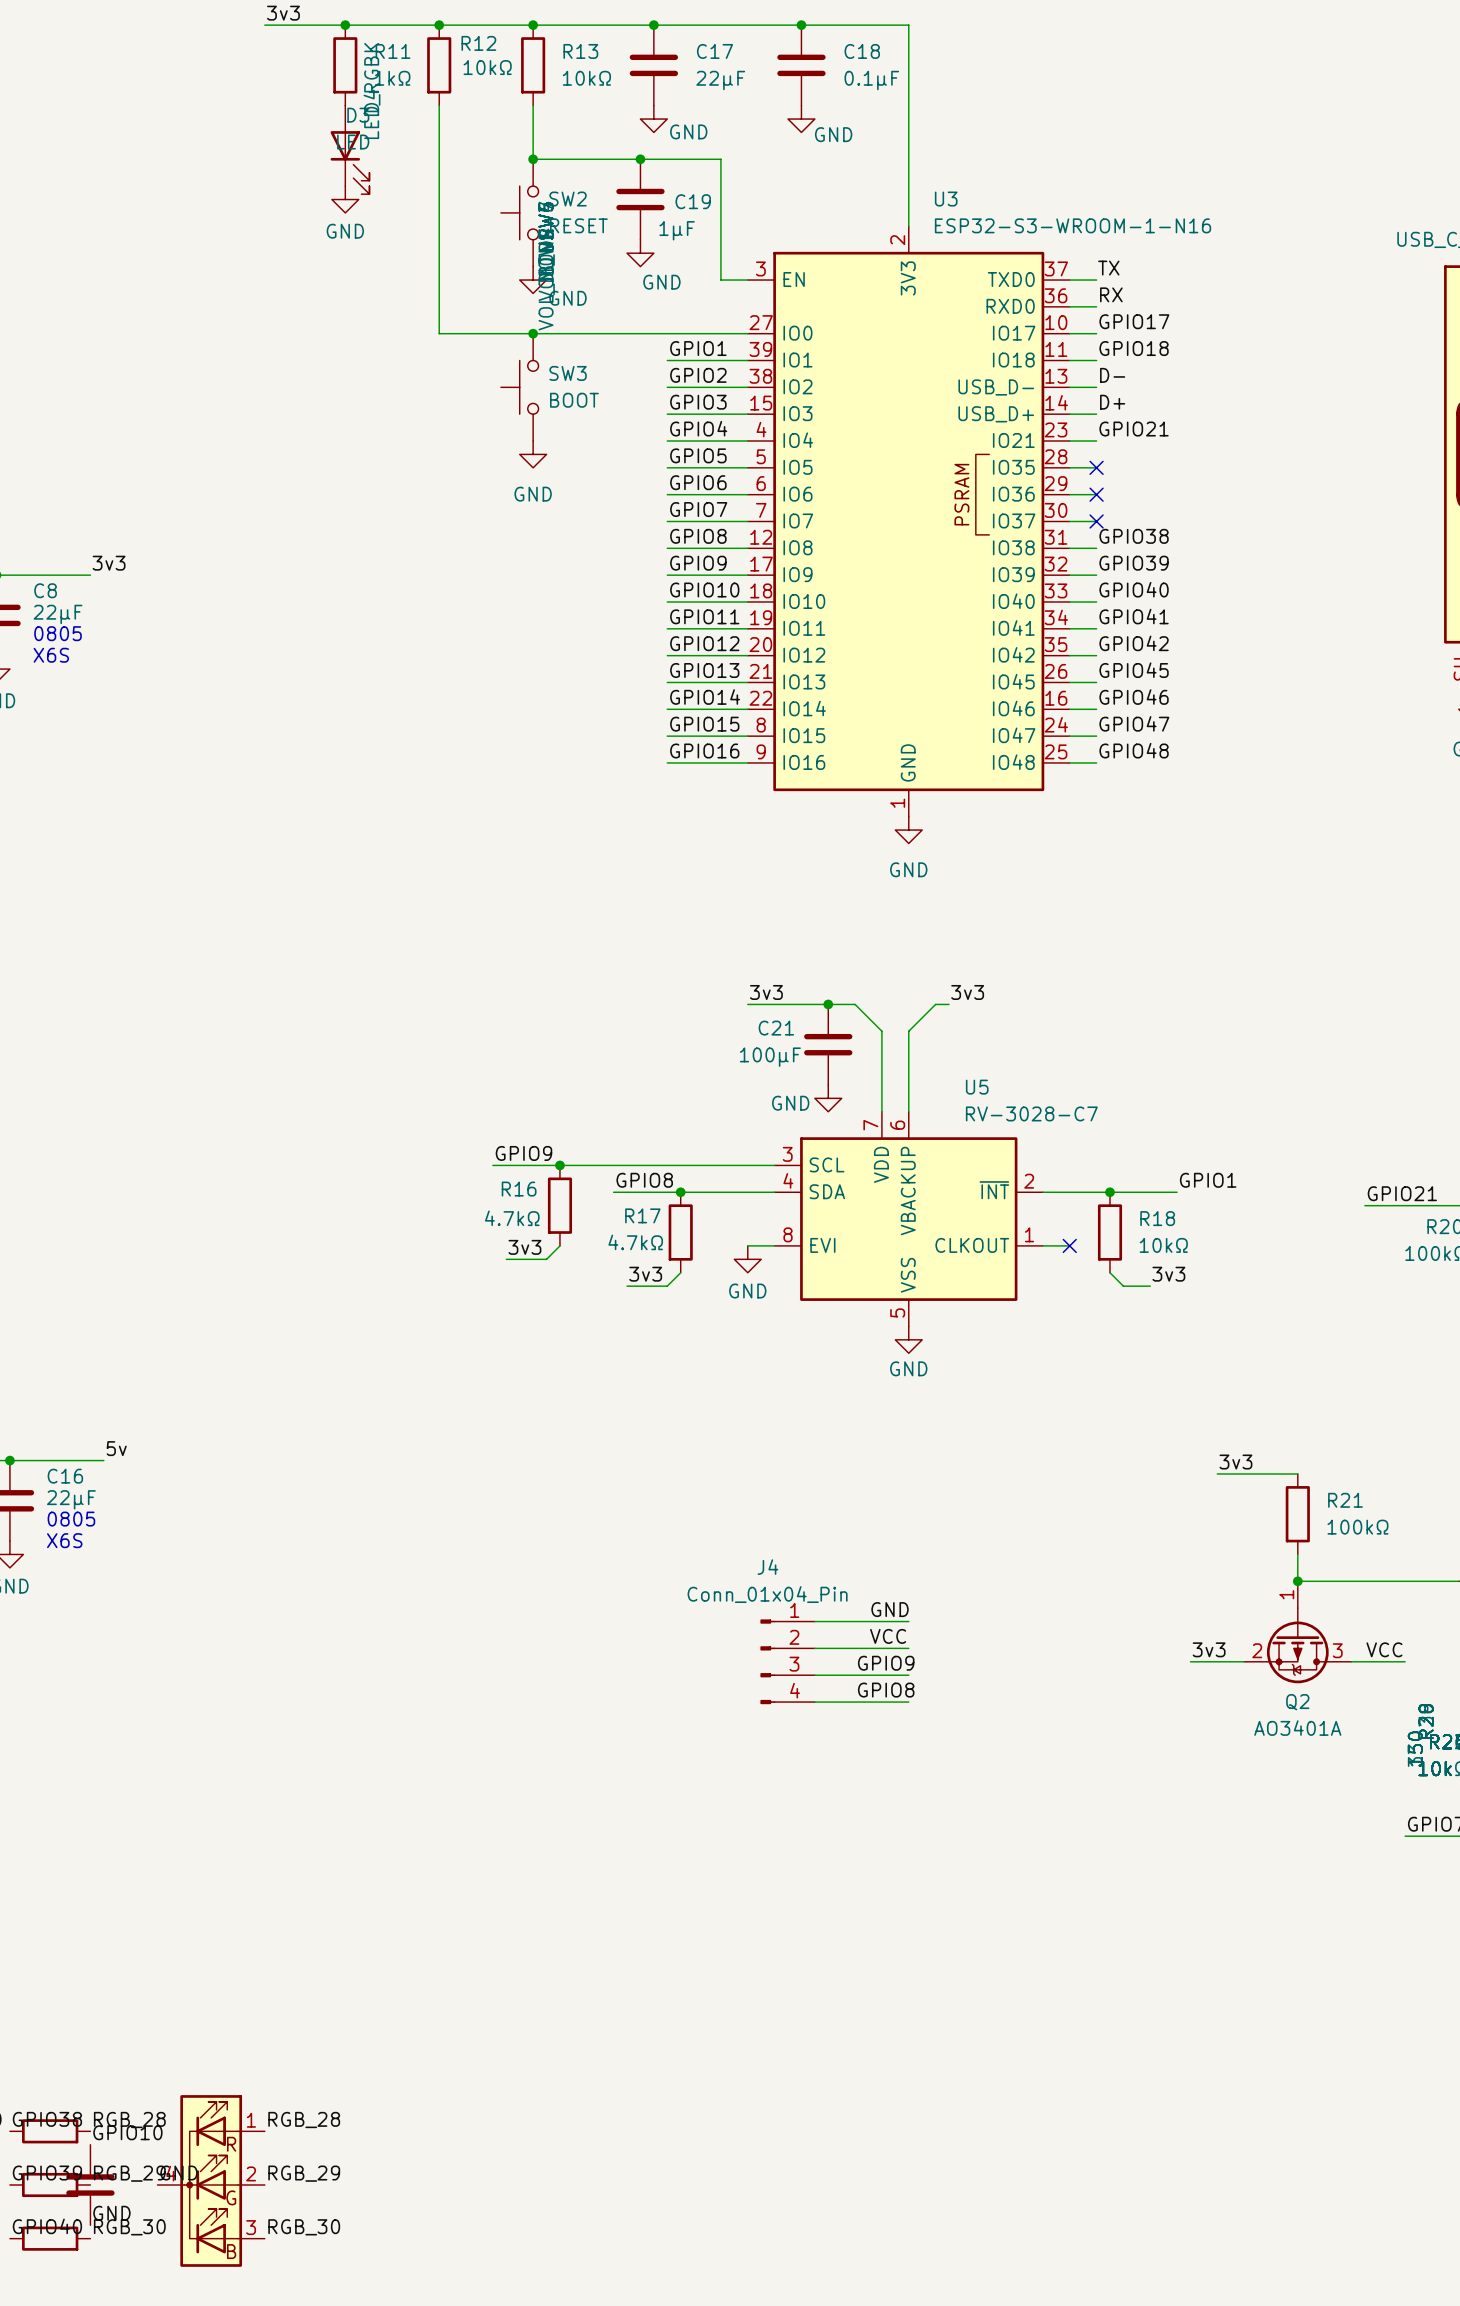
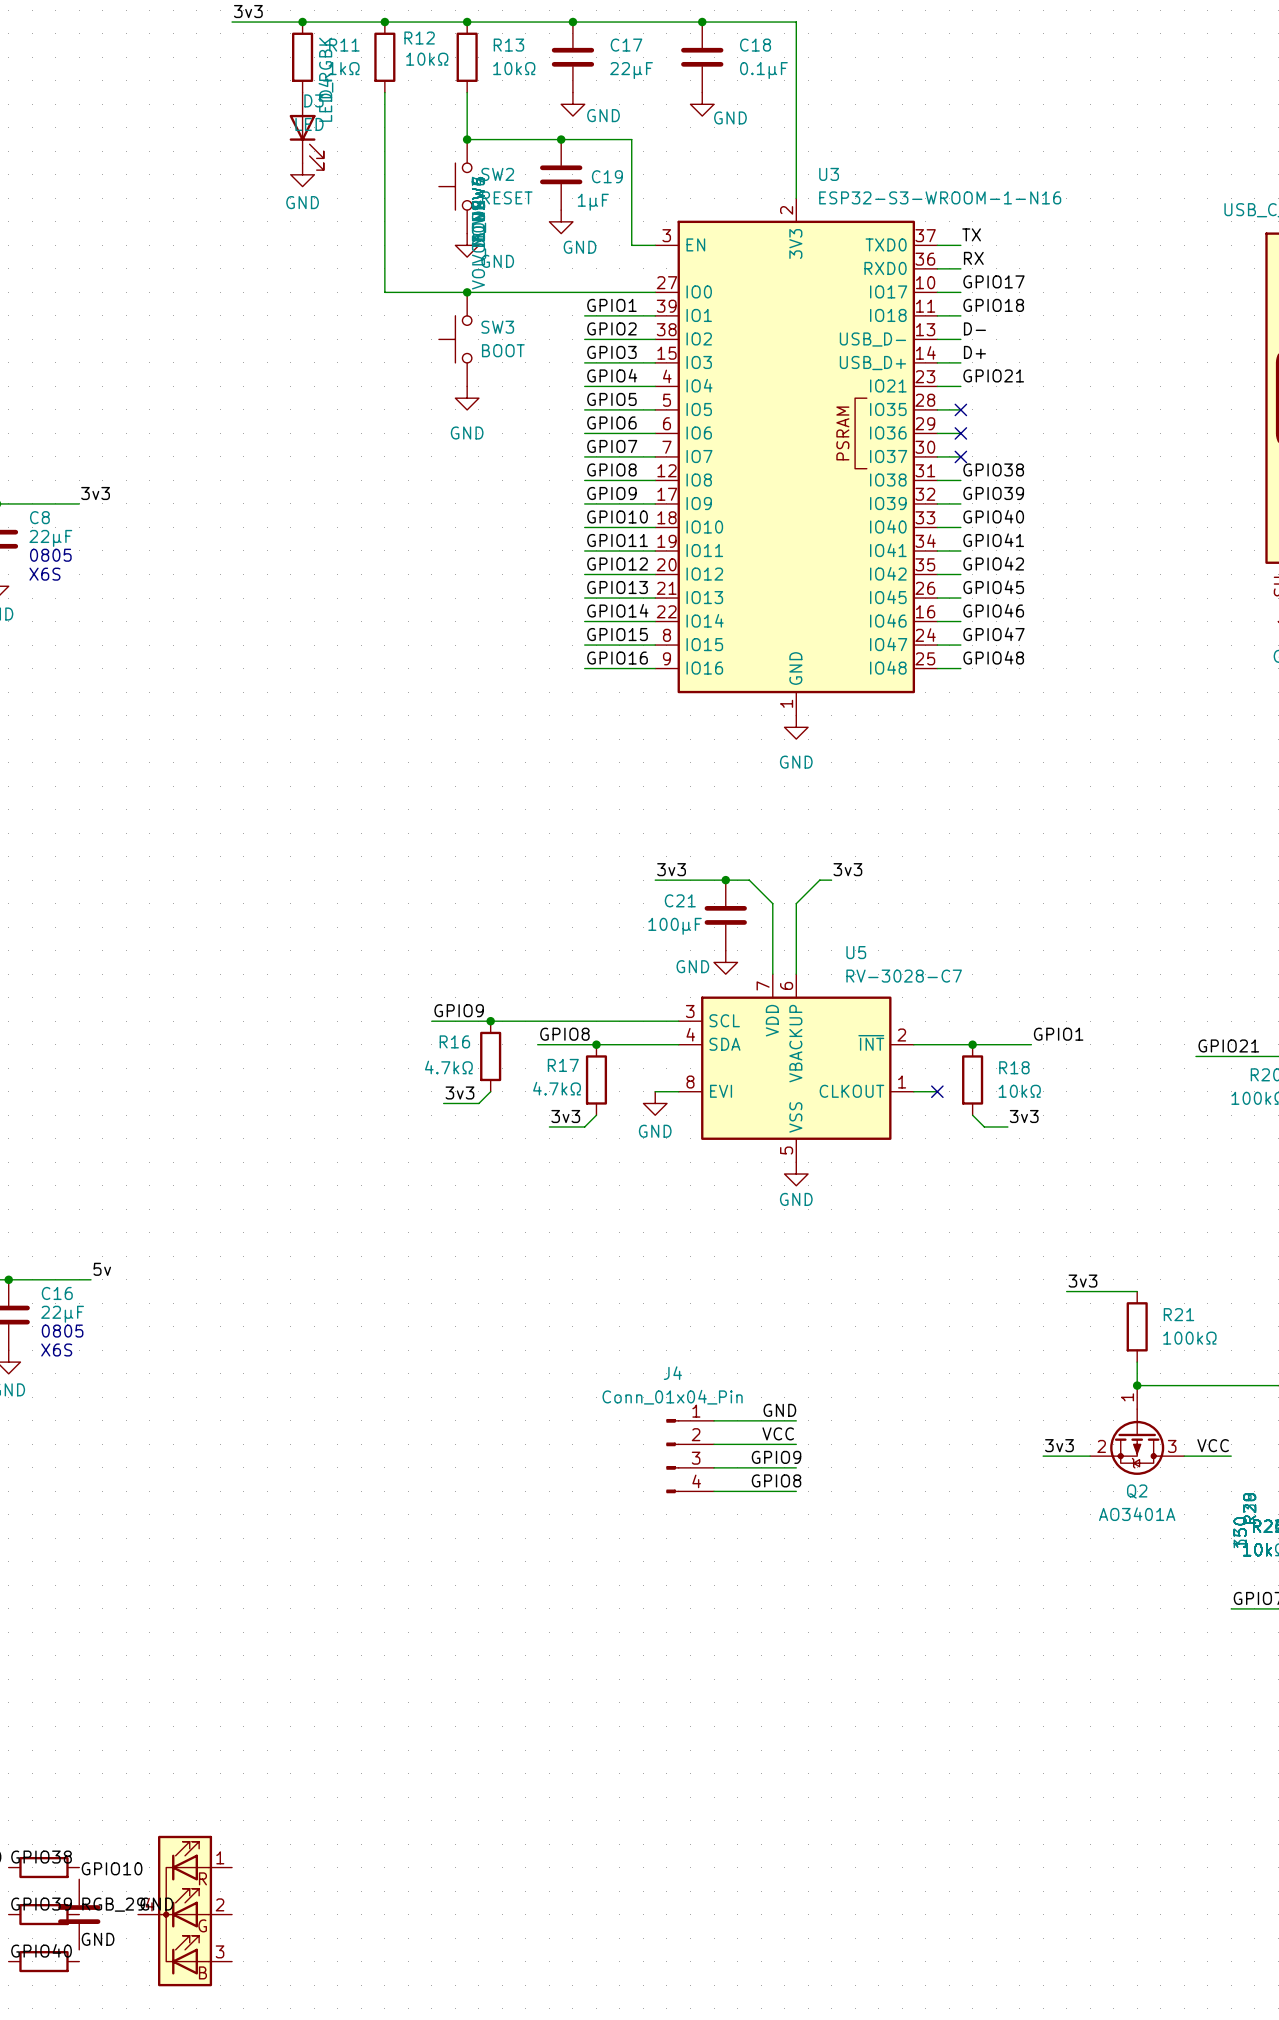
label: RGB_28 (129, 2120) -> none
label: RGB_28 (304, 2120) -> none
label: RGB_29 (304, 2173) -> none
label: RGB_30 (129, 2227) -> none
label: RGB_30 (304, 2227) -> none

